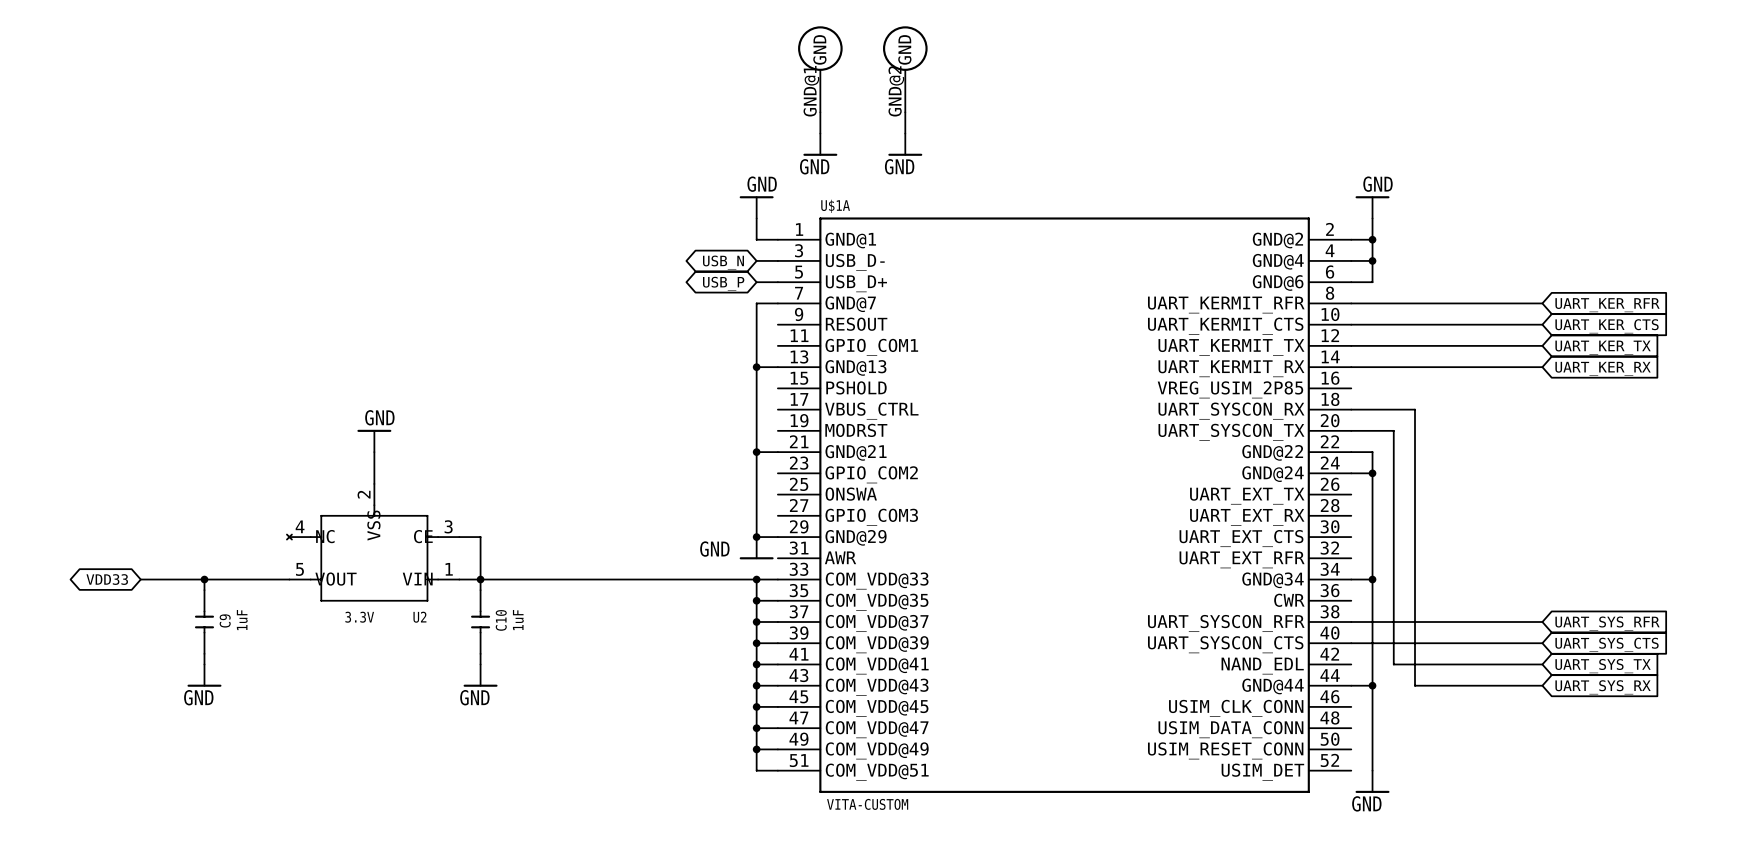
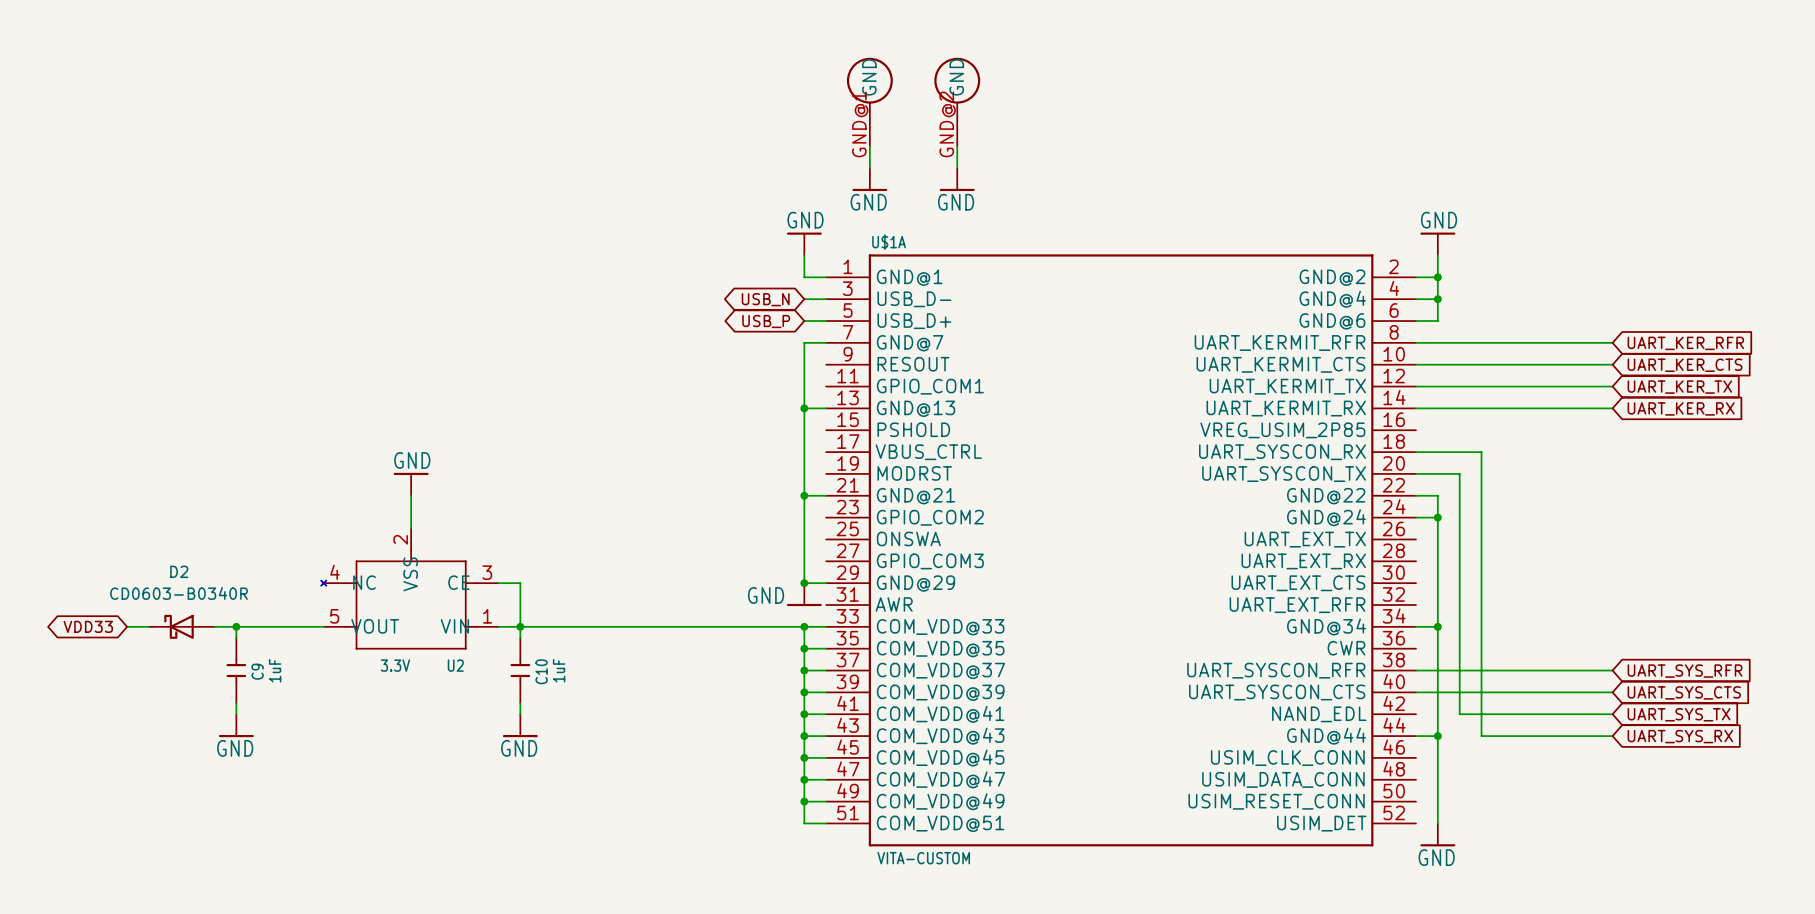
wire: none -> (127, 626) (148, 626)
global label position: VDD33 (107, 579) -> VDD33 (88, 626)
D2: none -> CD0603-B0340R (181, 626)

